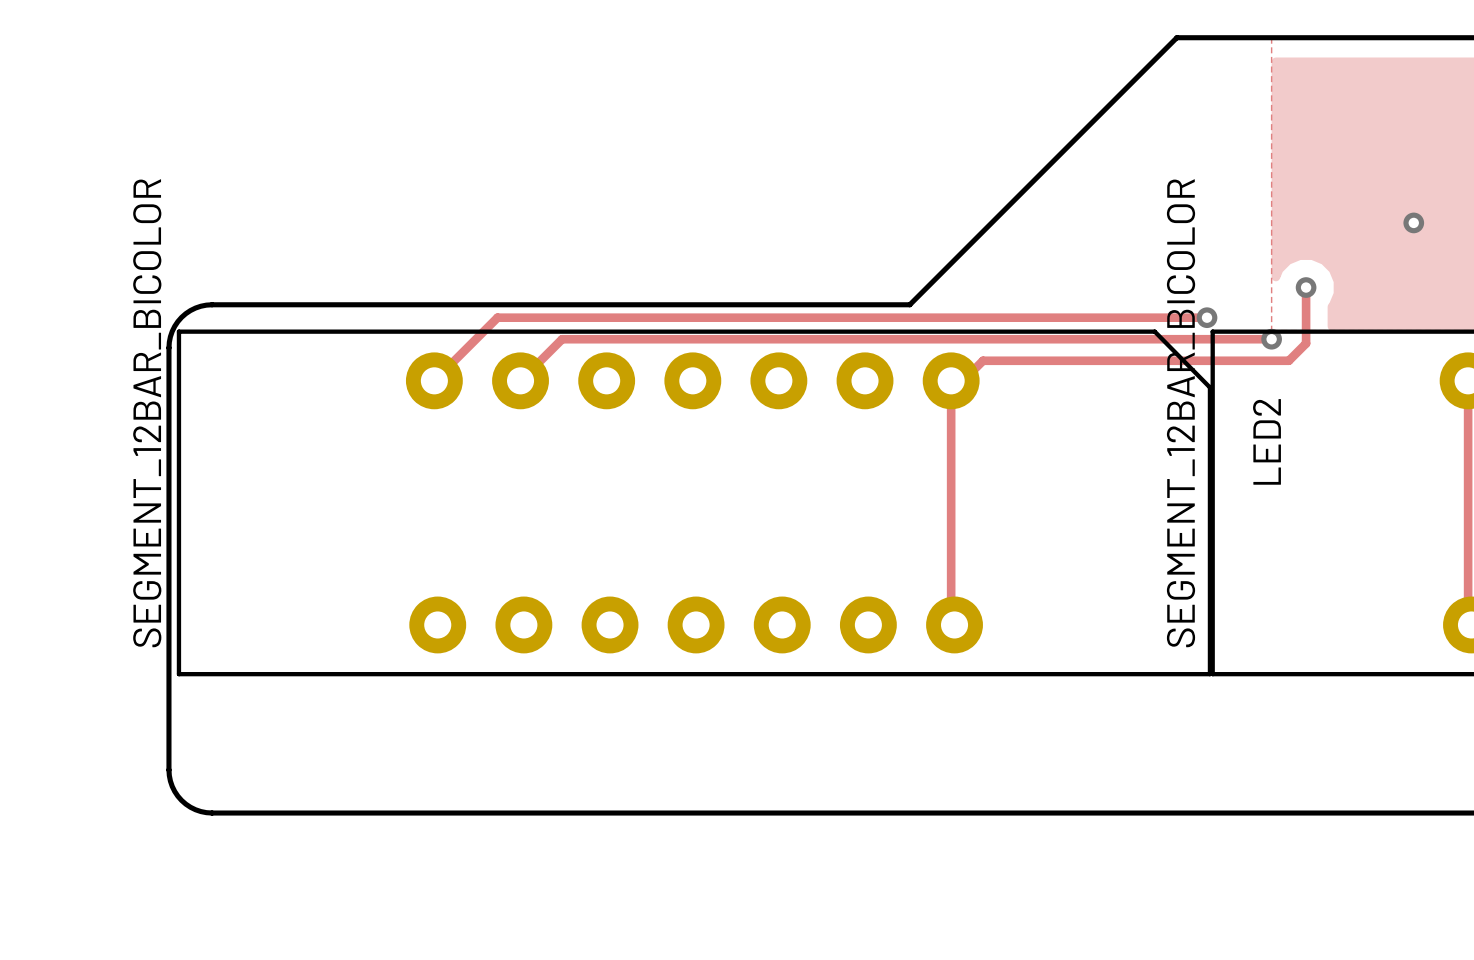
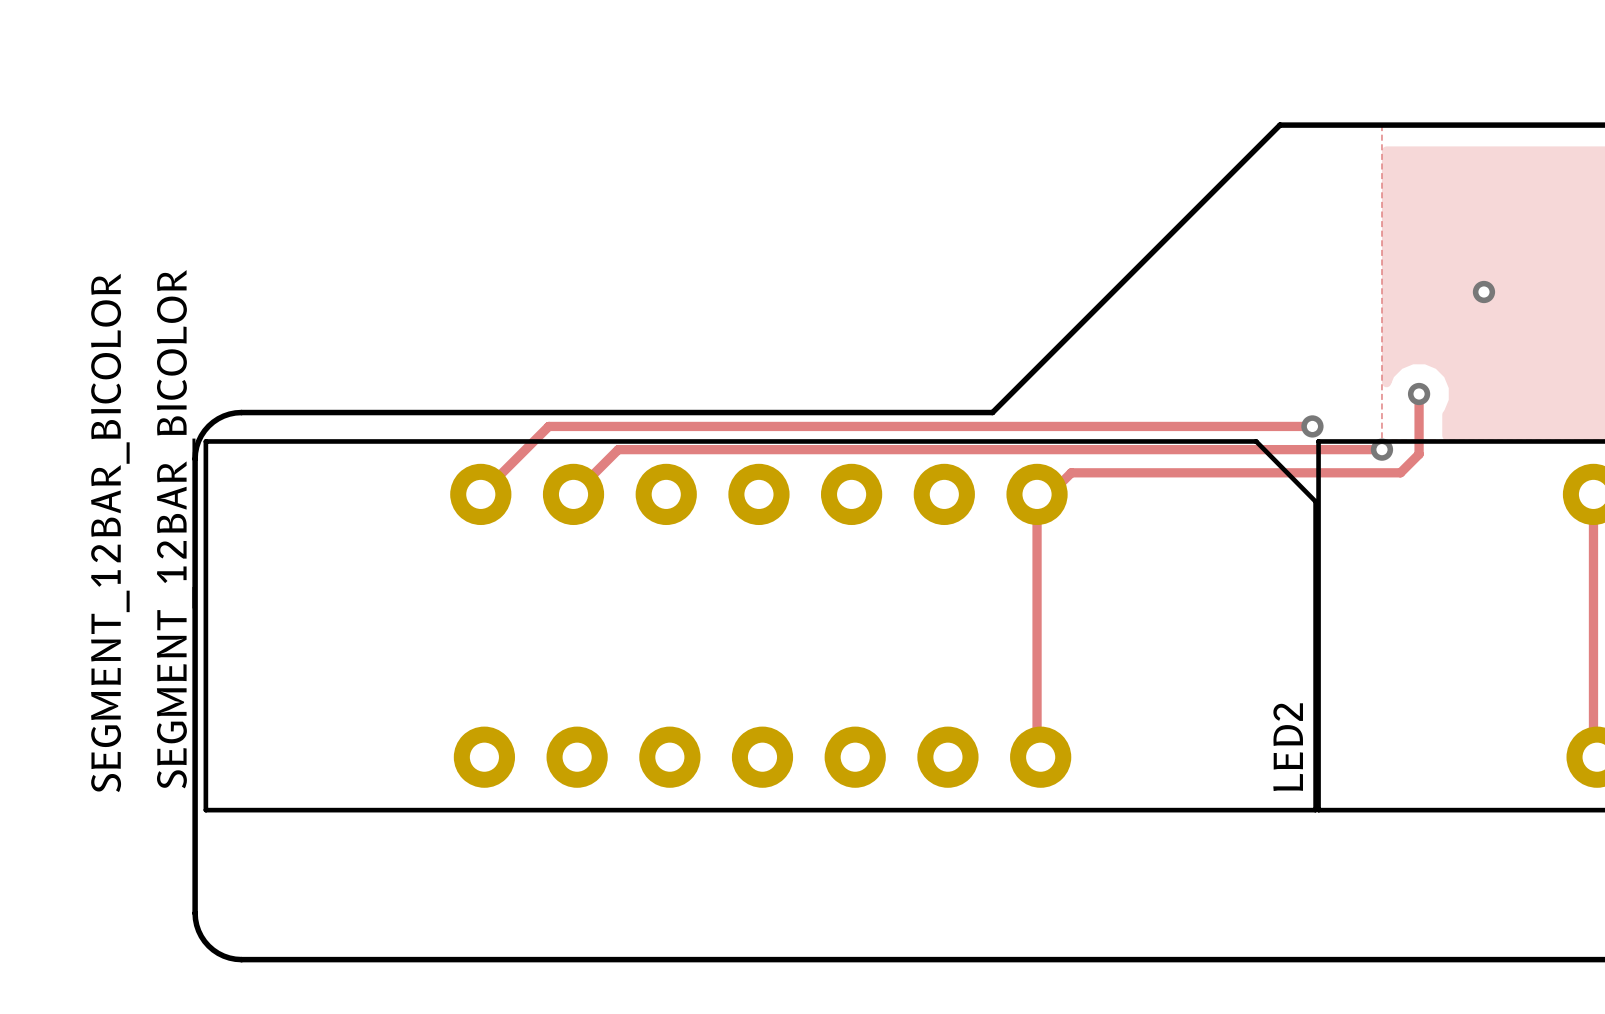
via position: (1413, 222) -> (1483, 292)
part value position: SEGMENT_12BAR_BICOLOR (1181, 413) -> SEGMENT_12BAR_BICOLOR (110, 532)
LED2 name position: LED2 (1266, 441) -> LED2 (1288, 747)

